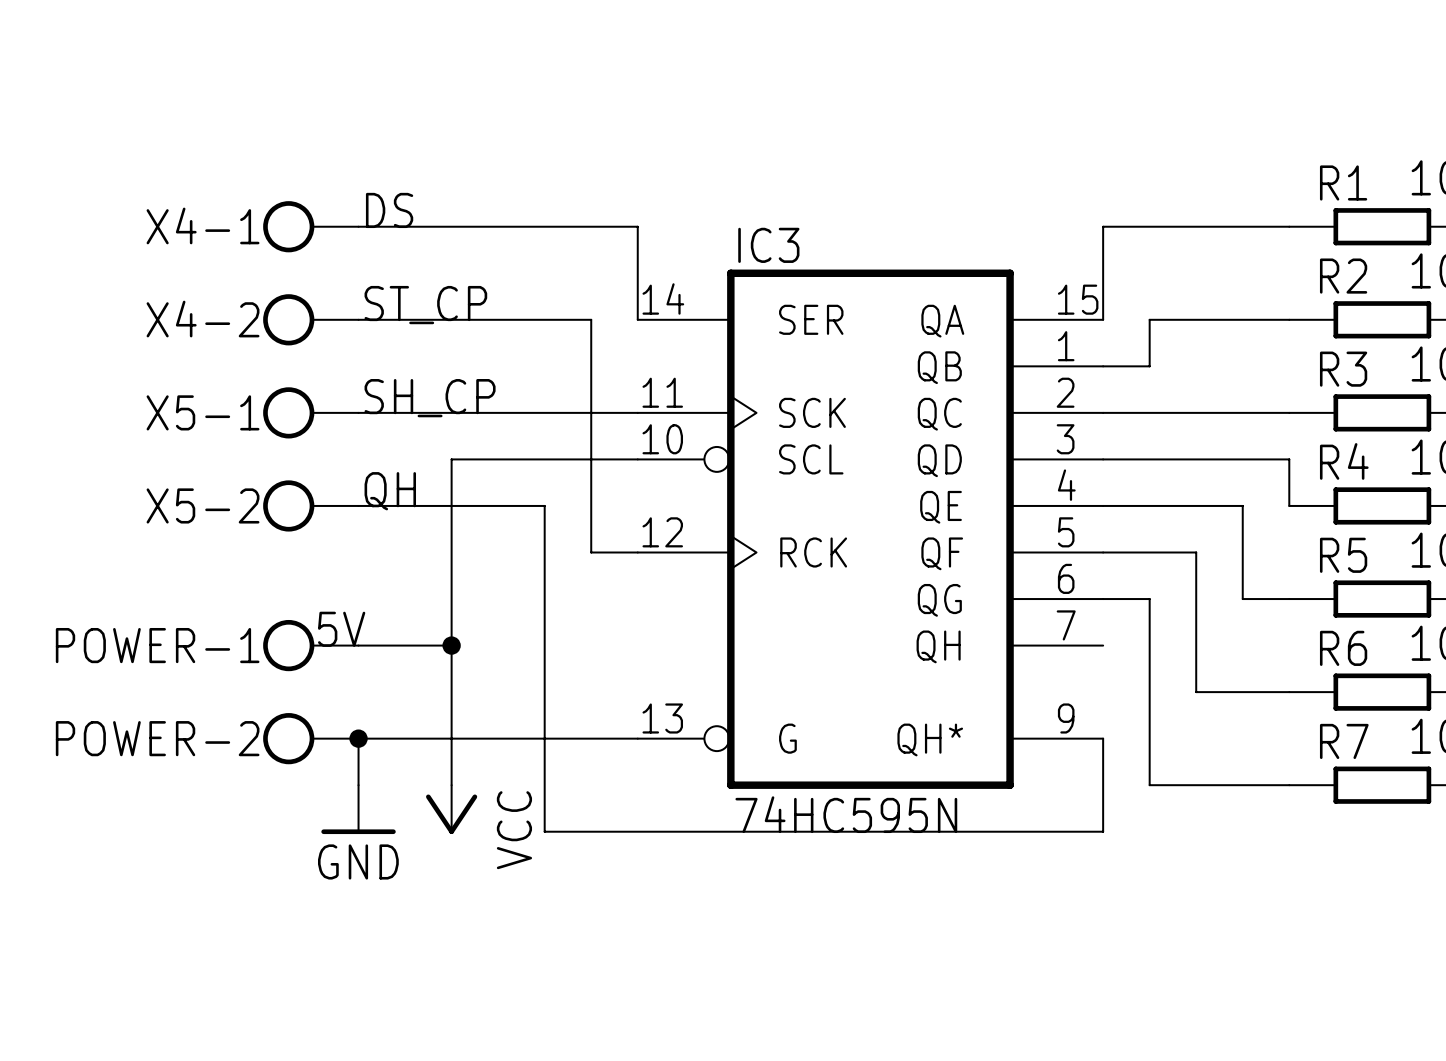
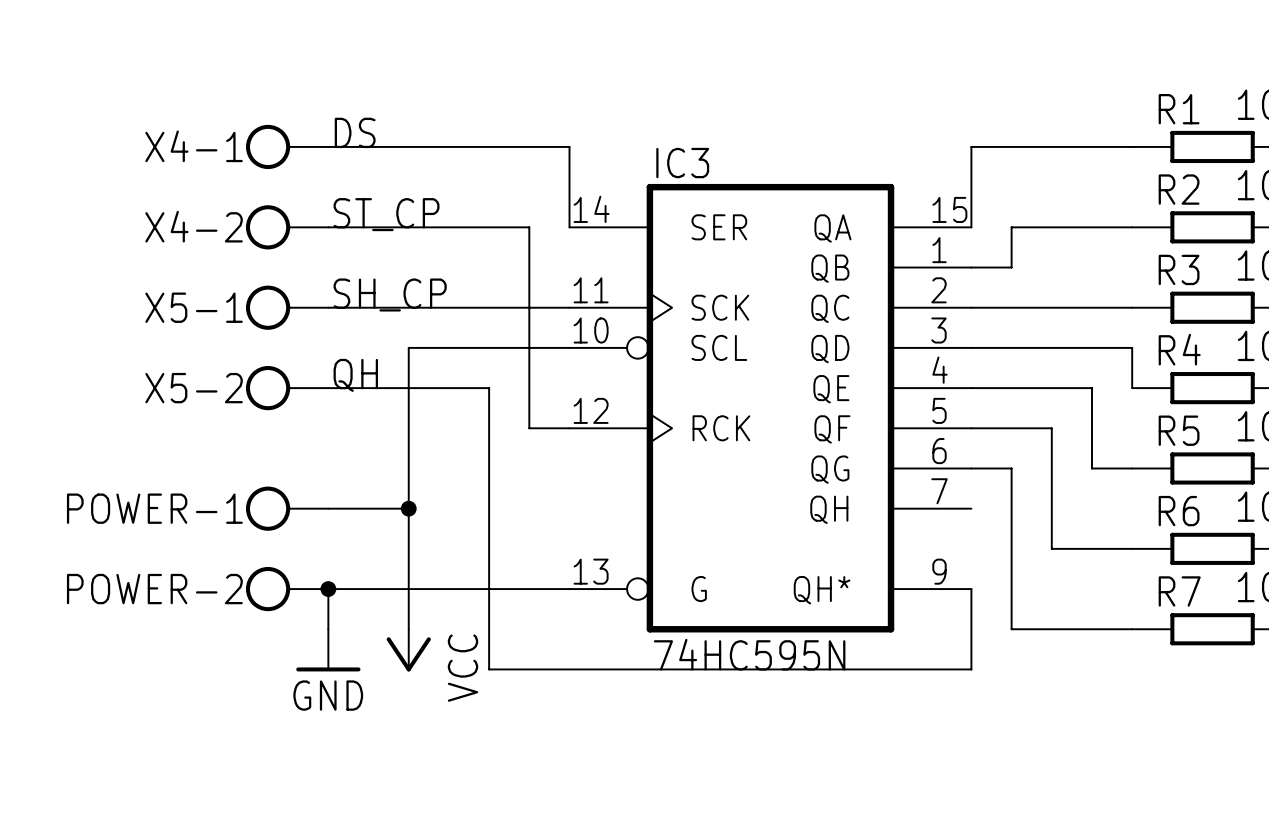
text: 5V (341, 629) -> none

